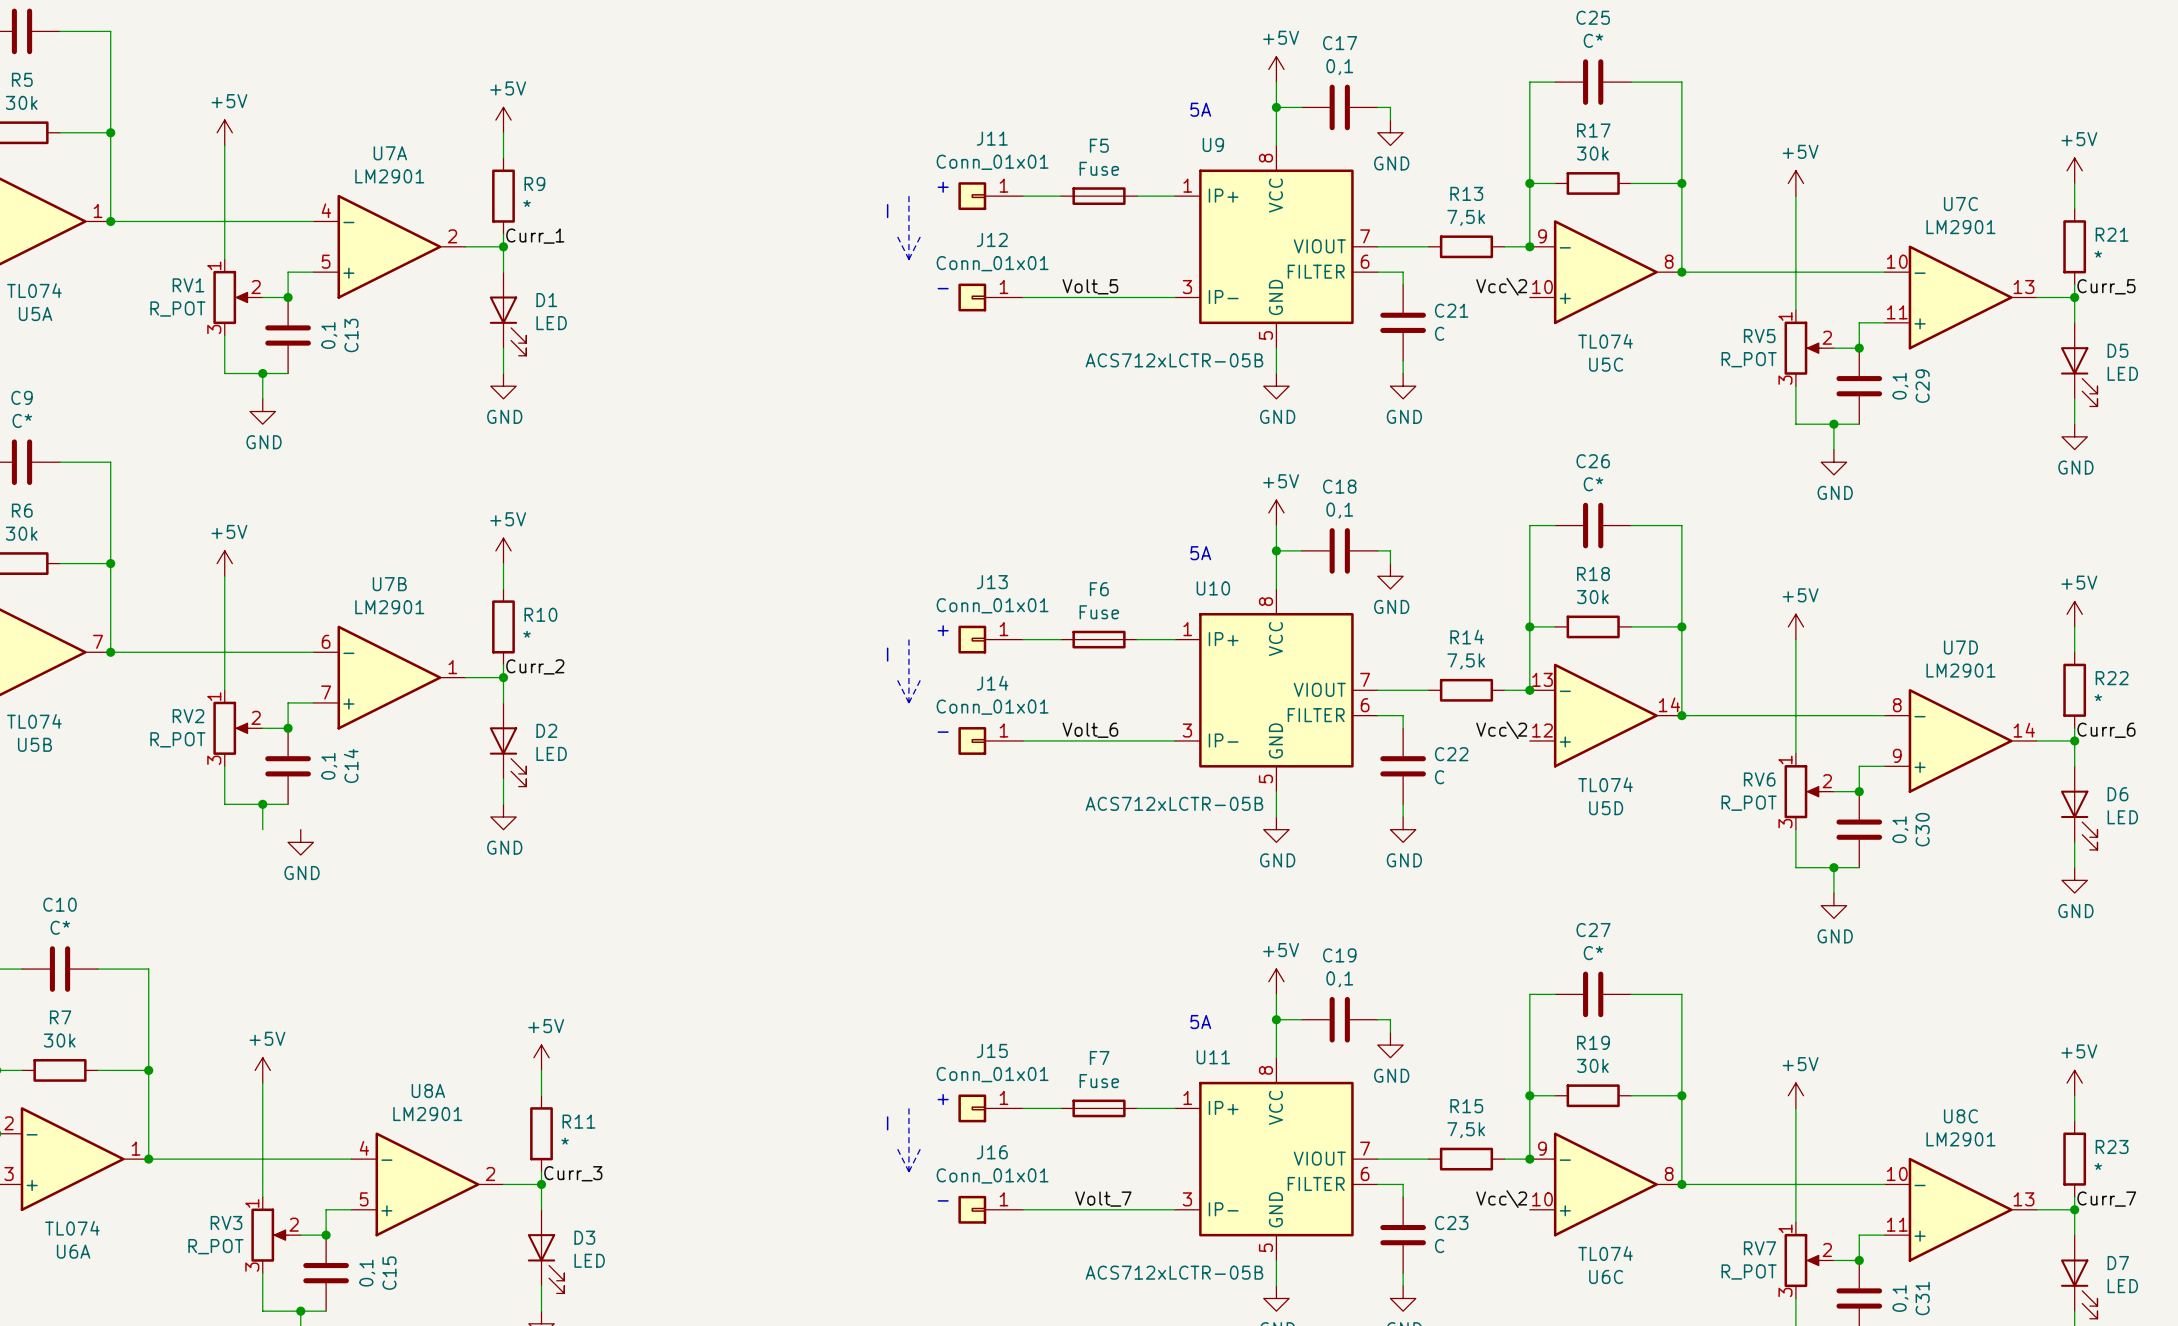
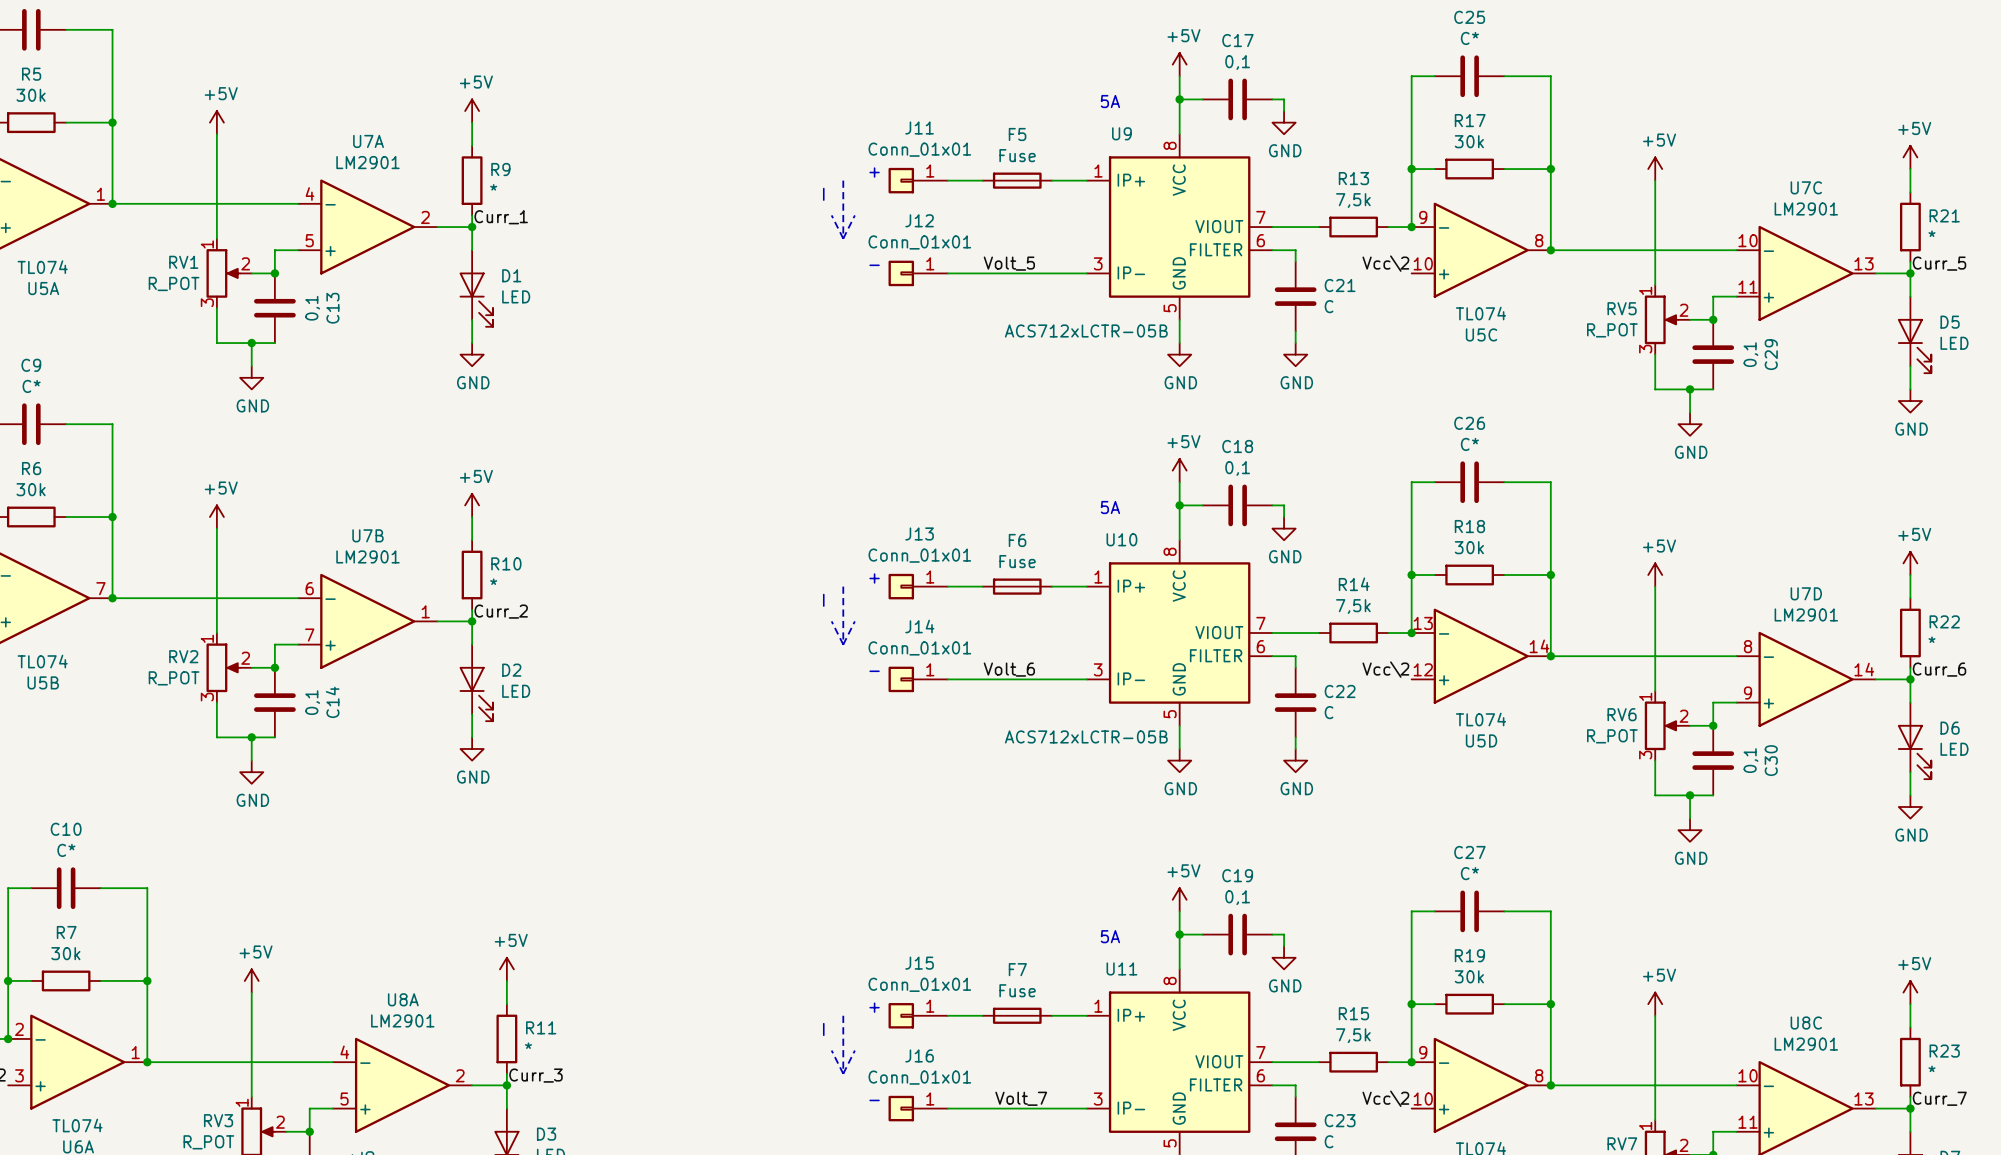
power symbol position: GND (300, 842) -> GND (251, 772)

